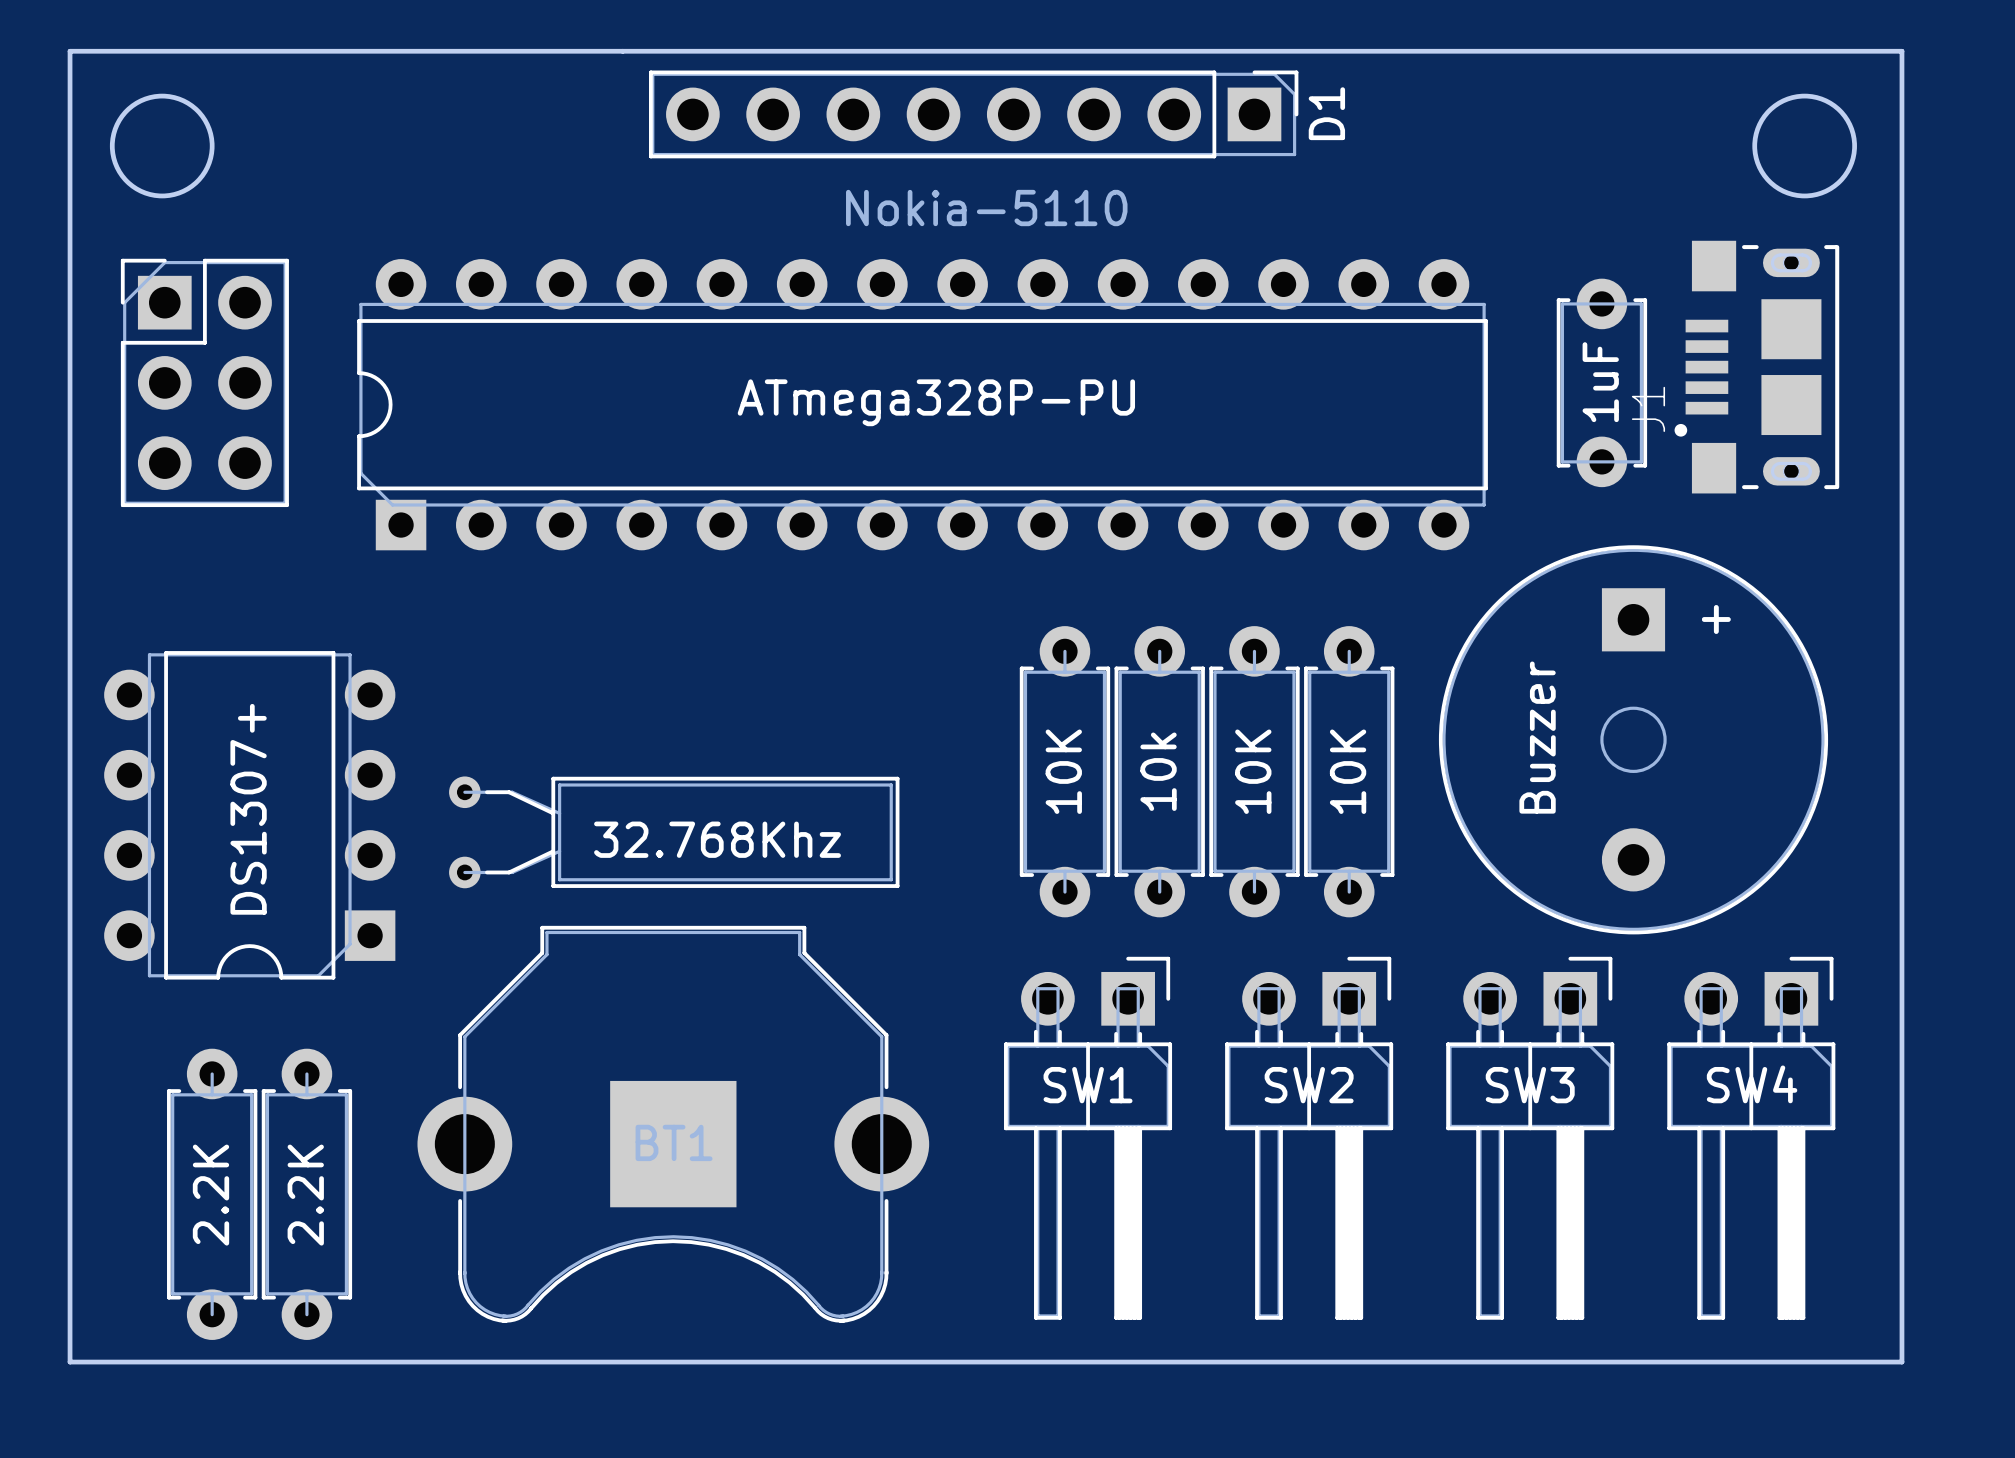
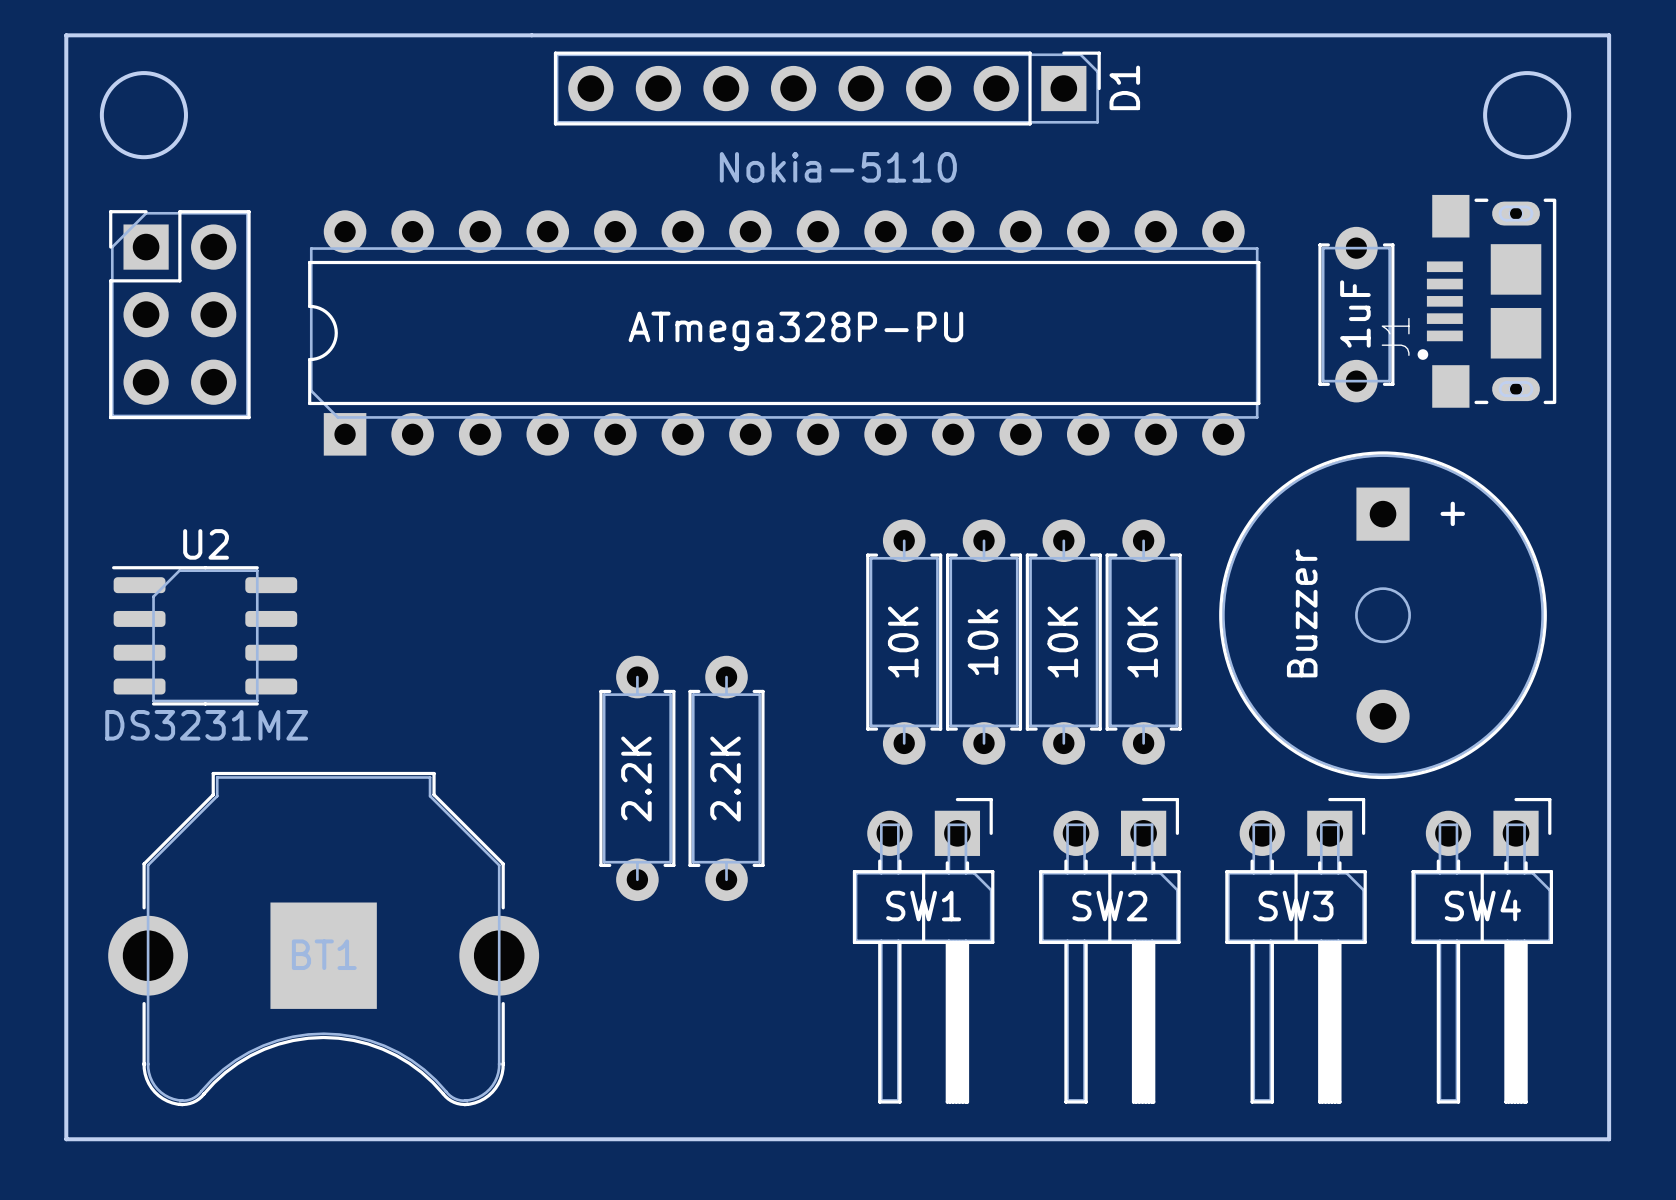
U2: none -> DS3231MZ (204, 635)
part: DS1307+ (249, 815) -> none
part: 32.768Khz (674, 832) -> none
part: none -> 2.2K (637, 778)
part: none -> 2.2K (726, 778)
part position: (673, 1124) -> (323, 939)
part: 2.2K (212, 1194) -> none
part: 2.2K (306, 1194) -> none

